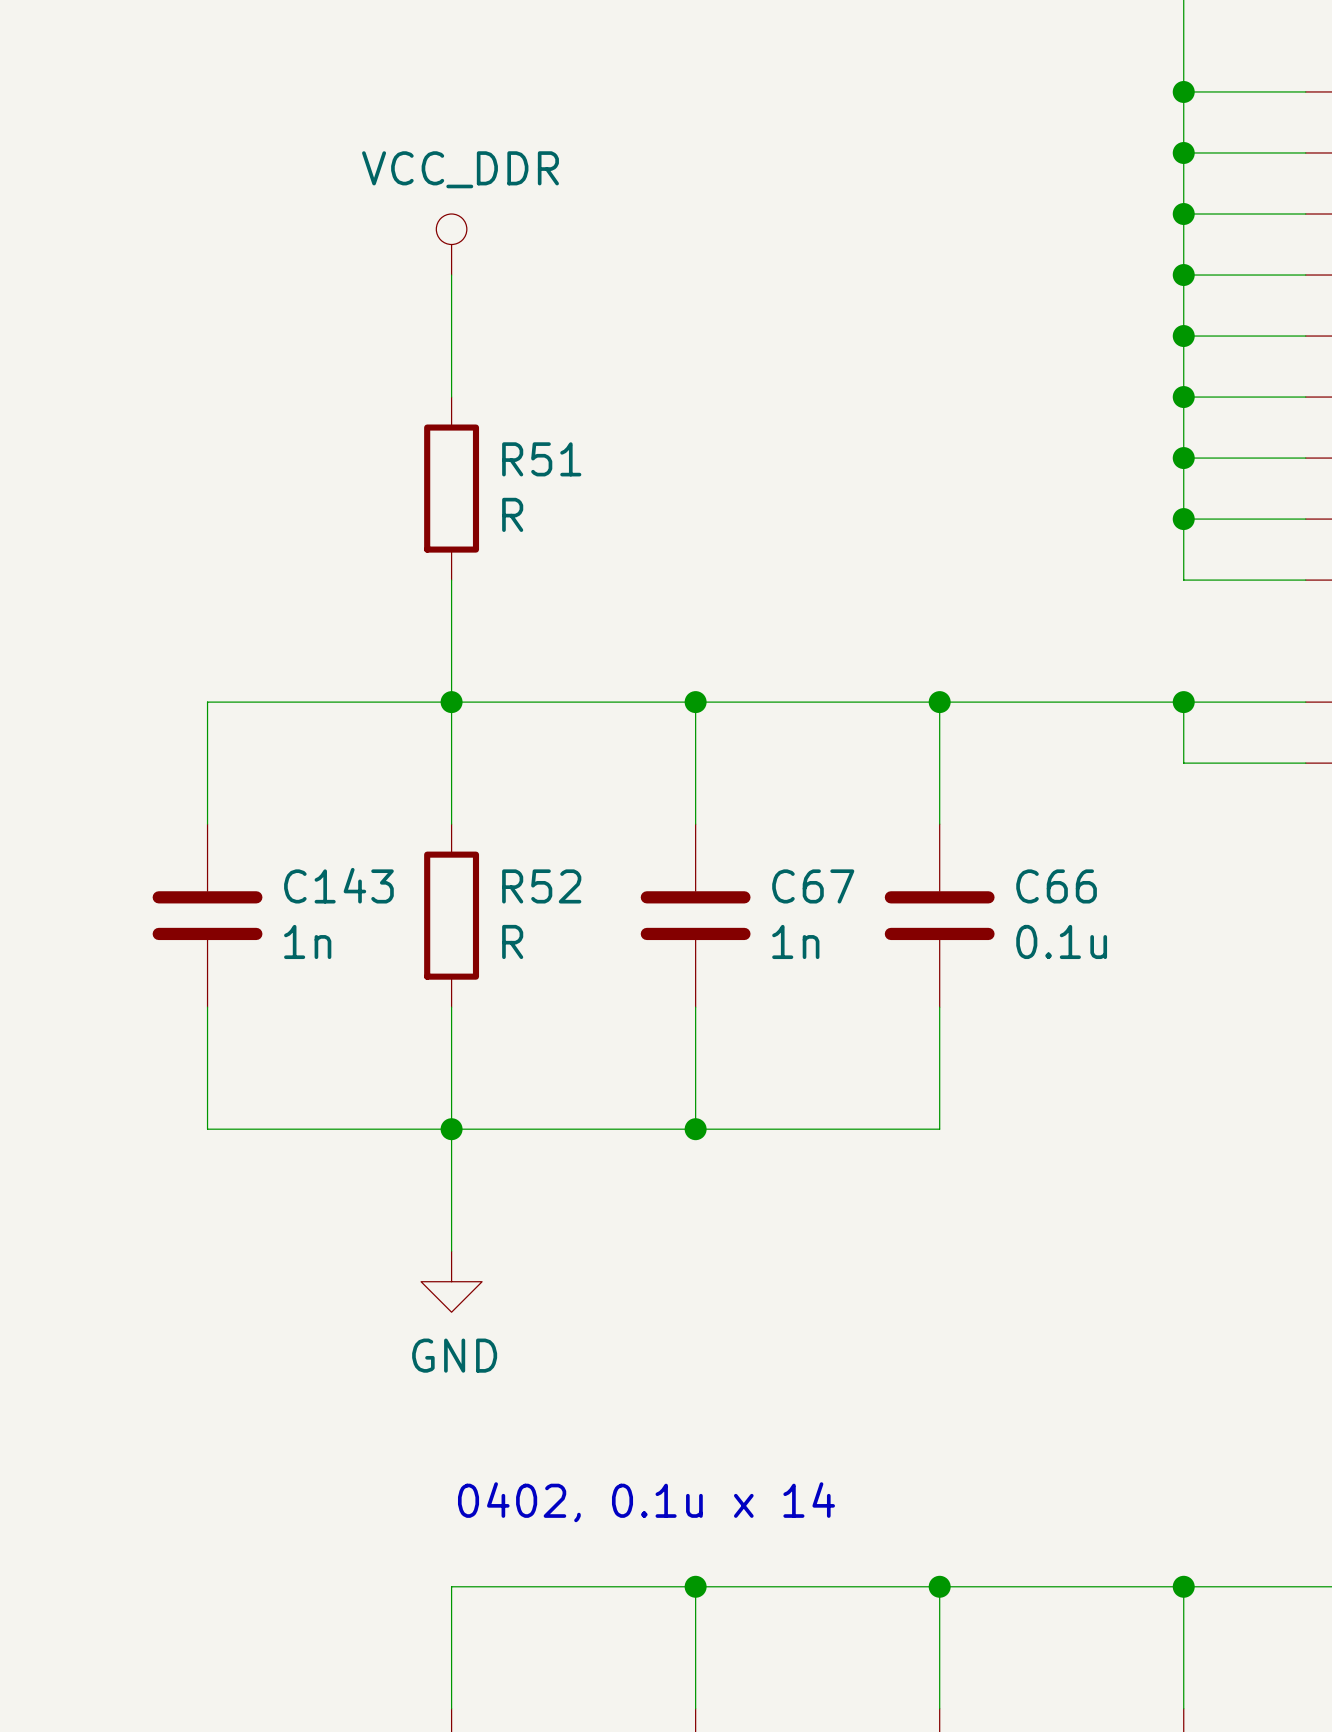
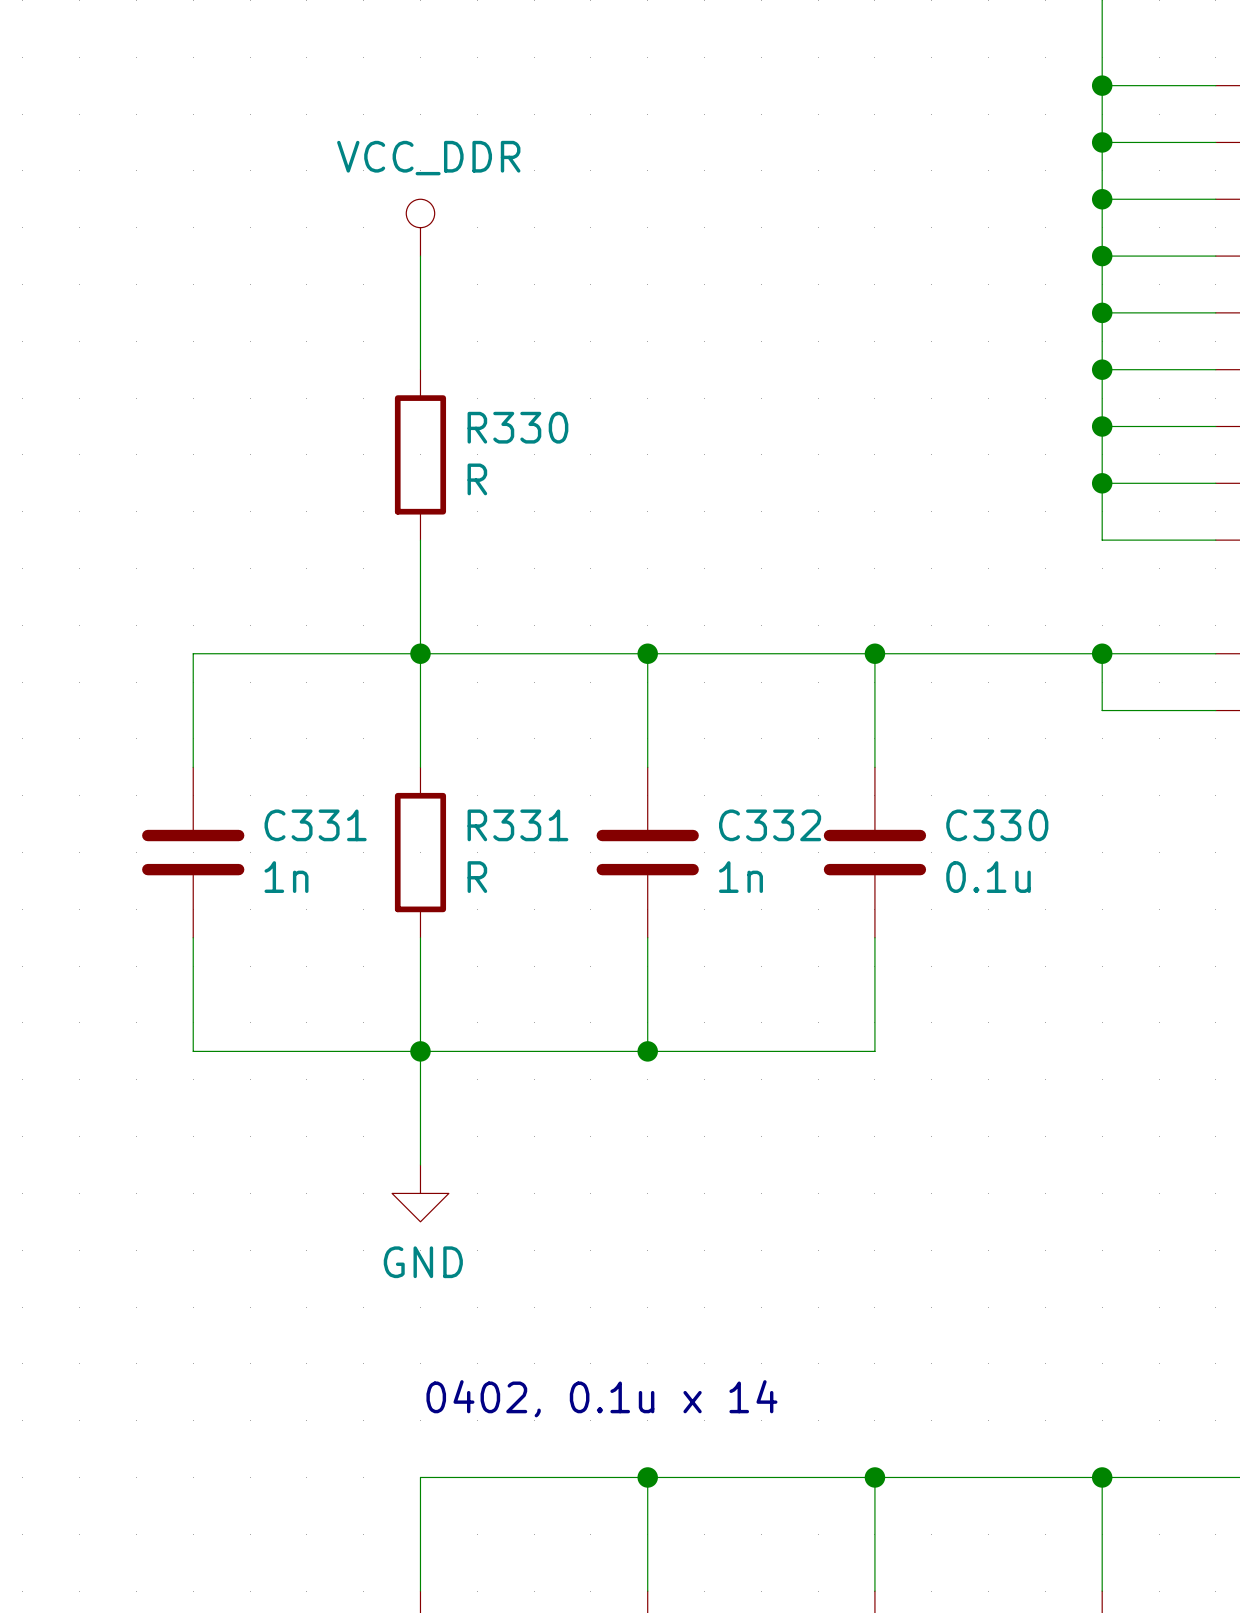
R51 name: R51 (541, 459) -> R330 (517, 427)
C143 name: C143 (338, 885) -> C331 (315, 825)
R52 name: R52 (541, 886) -> R331 (517, 825)
C67 name: C67 (813, 886) -> C332 (770, 825)
C66 name: C66 (1056, 886) -> C330 (997, 825)

